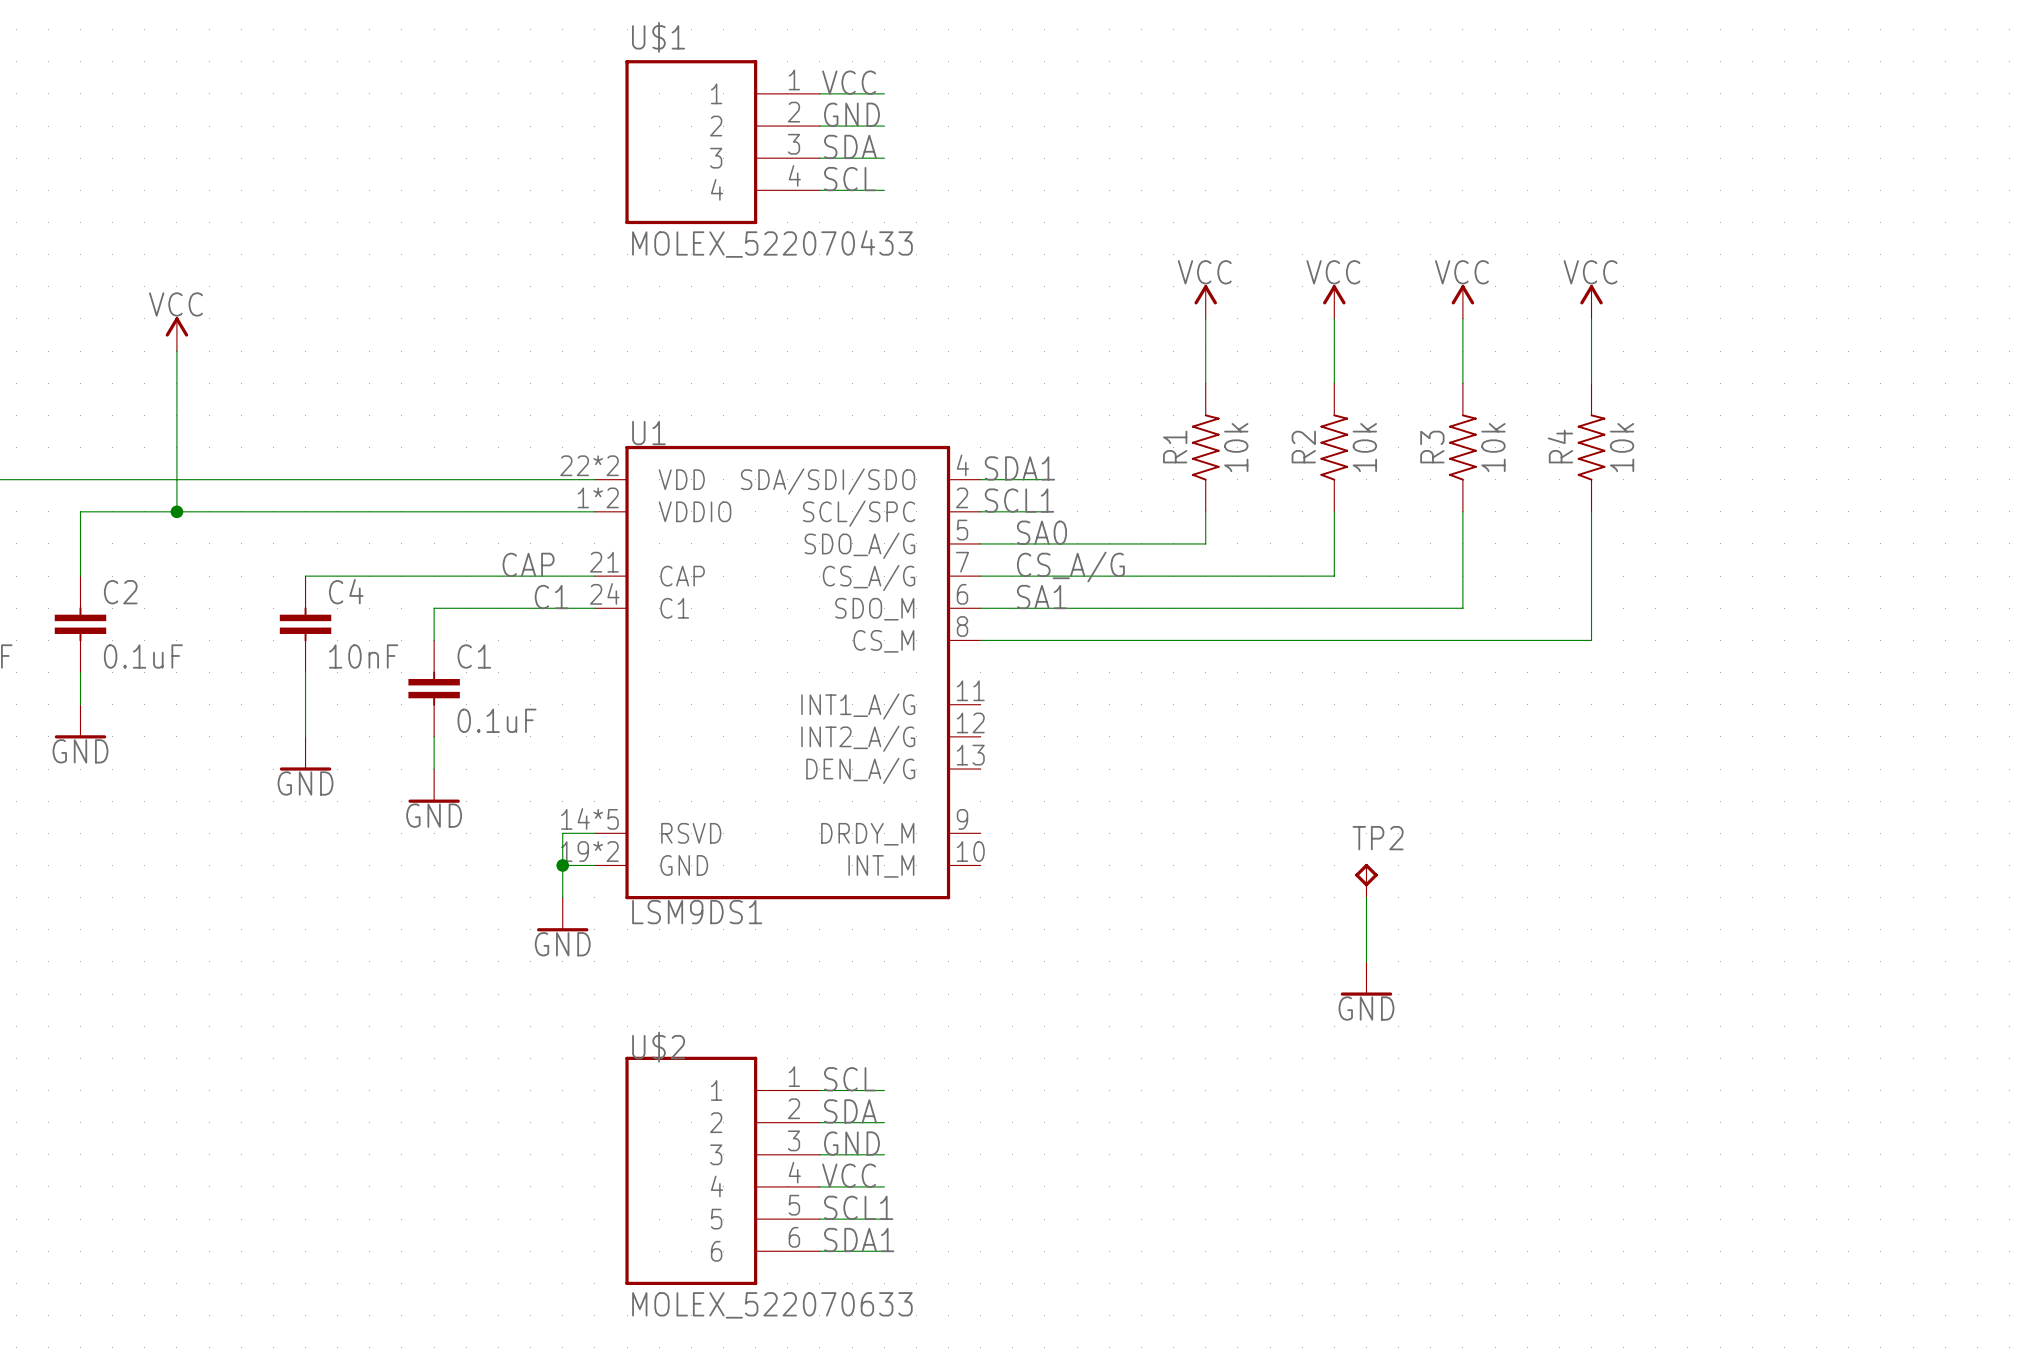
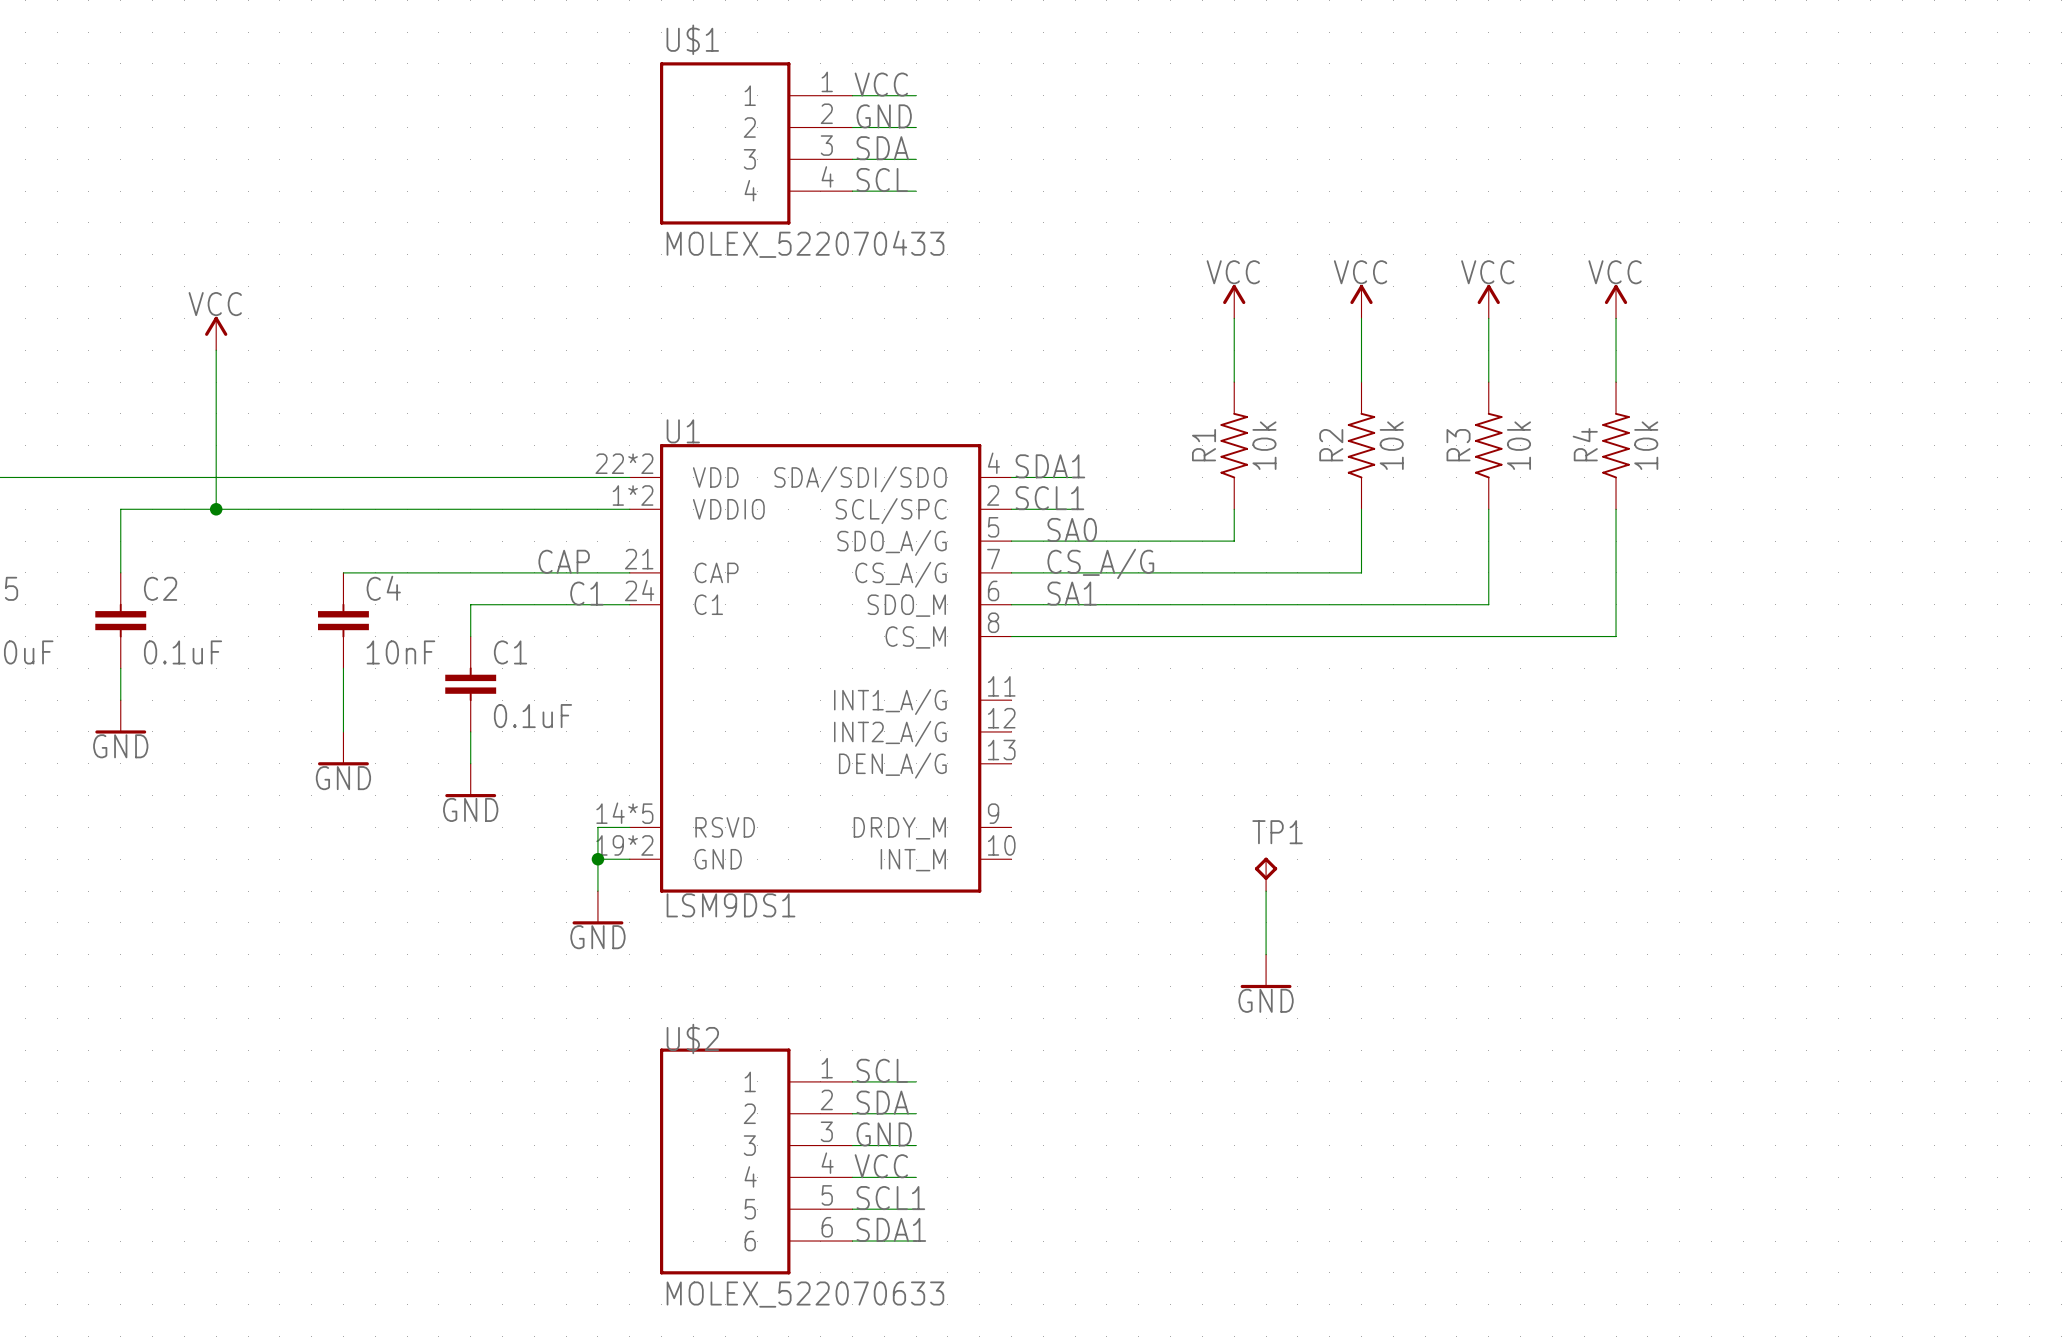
TP1: none -> (1266, 874)
TP2: (1366, 880) -> none
wire: (1366, 897) (1366, 961) -> (1266, 891) (1266, 954)
power symbol position: GND (1366, 978) -> GND (1266, 971)

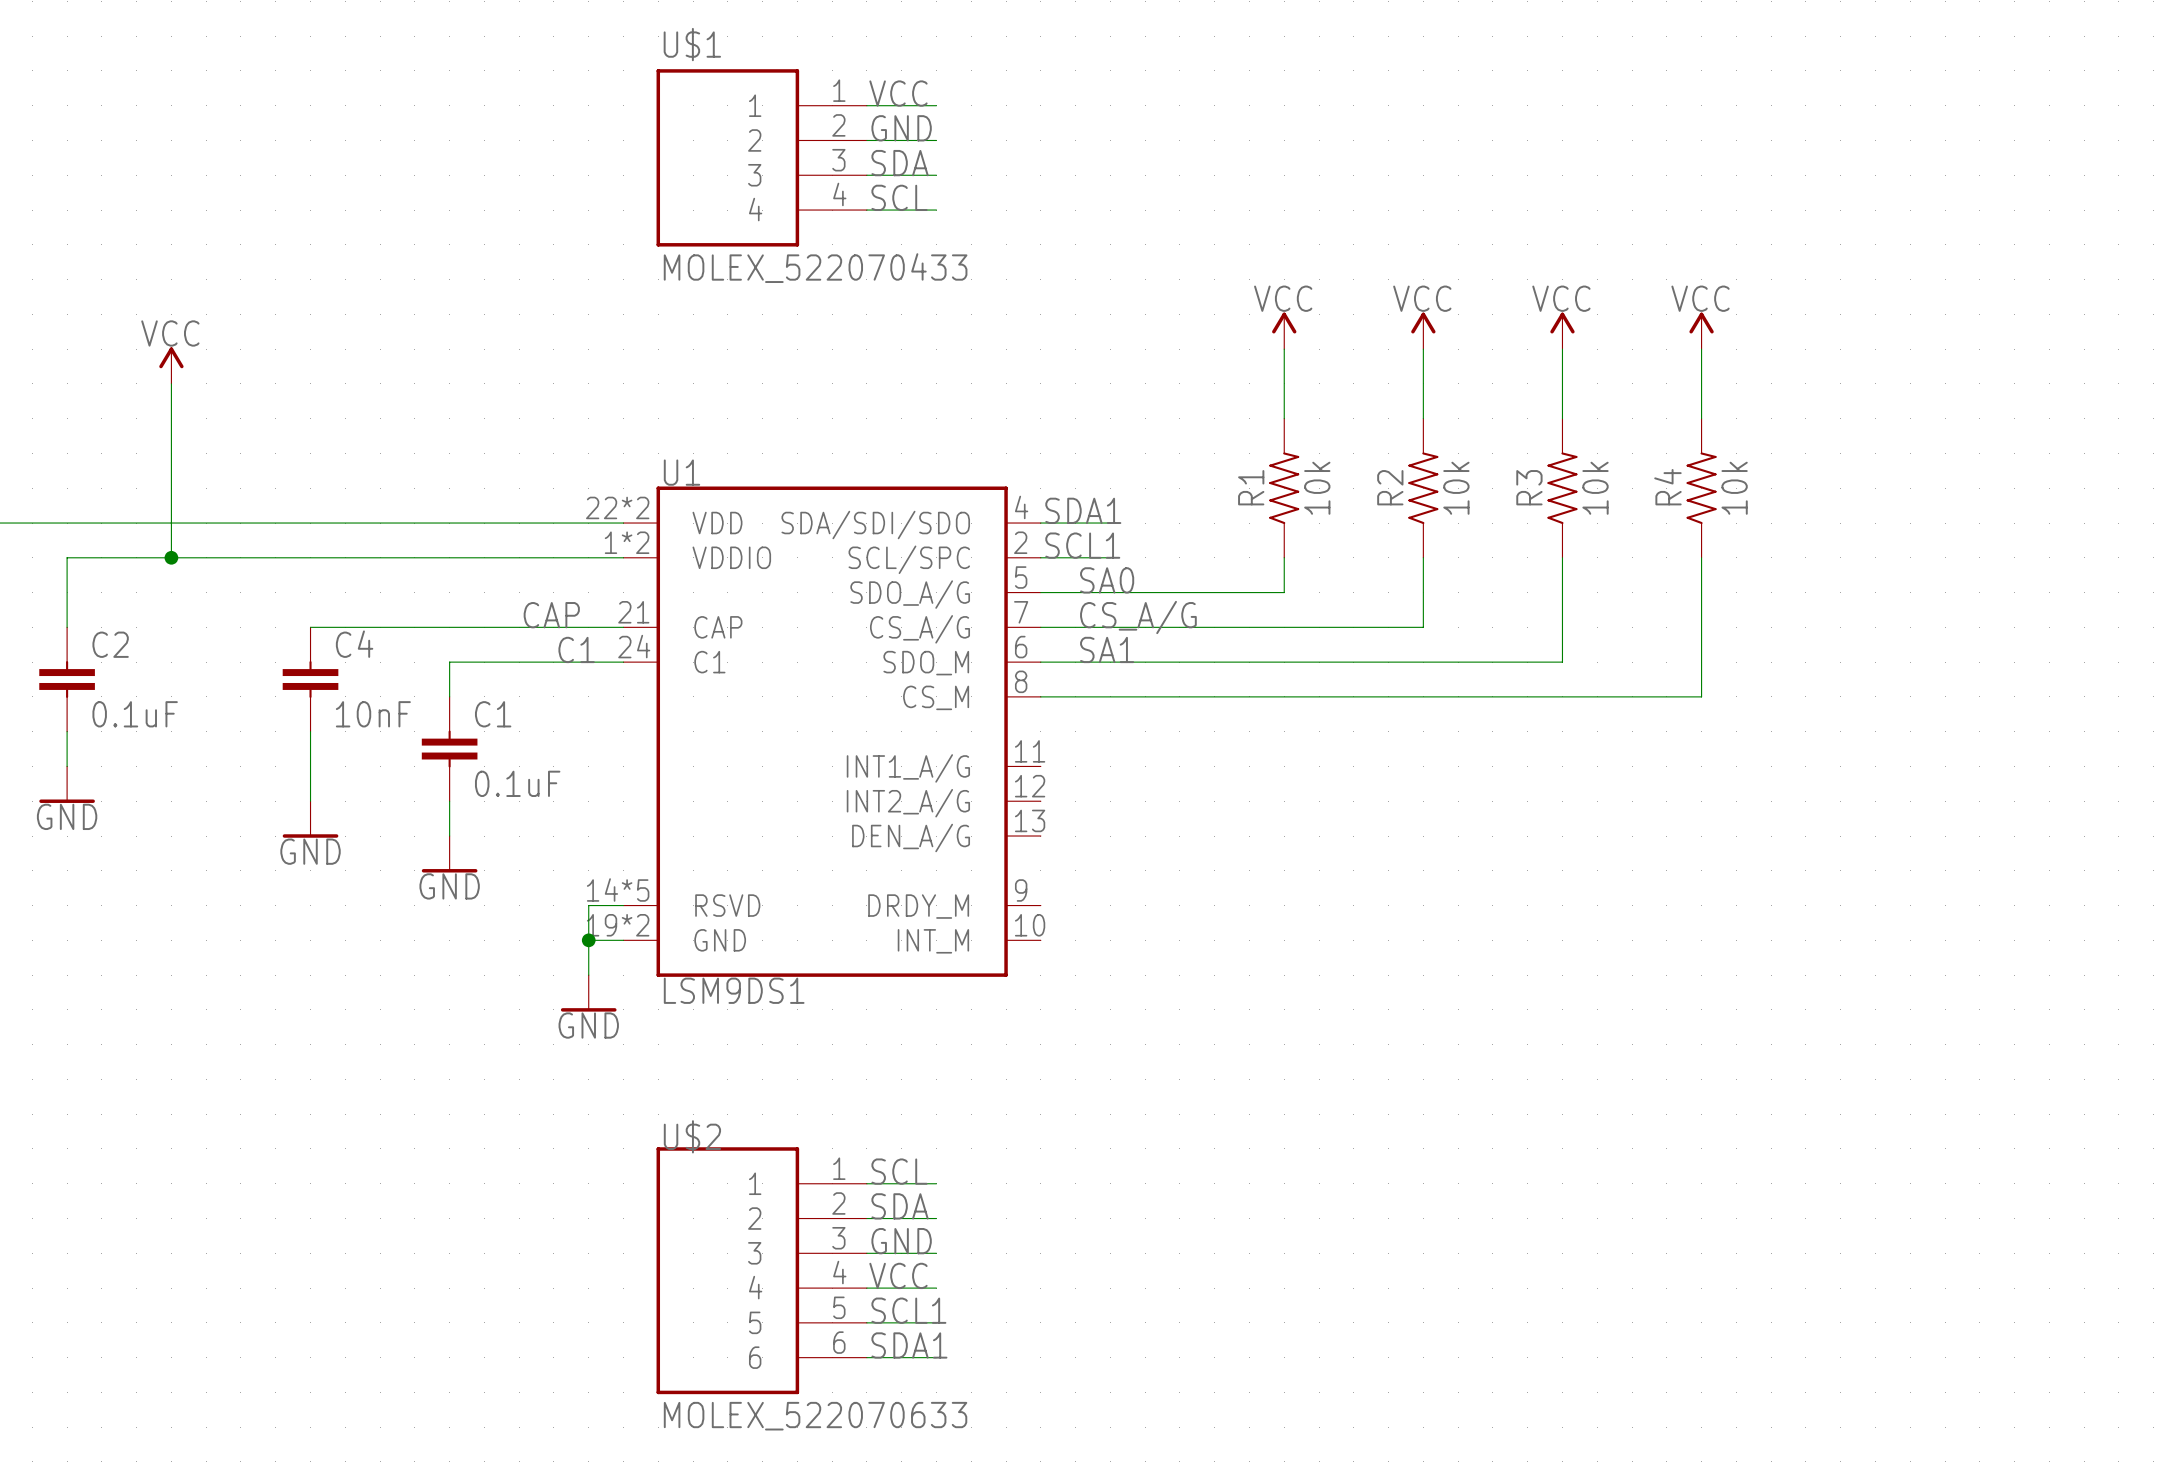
TP1: (1266, 874) -> none
wire: (1266, 891) (1266, 954) -> none
power symbol: GND (1266, 971) -> none

